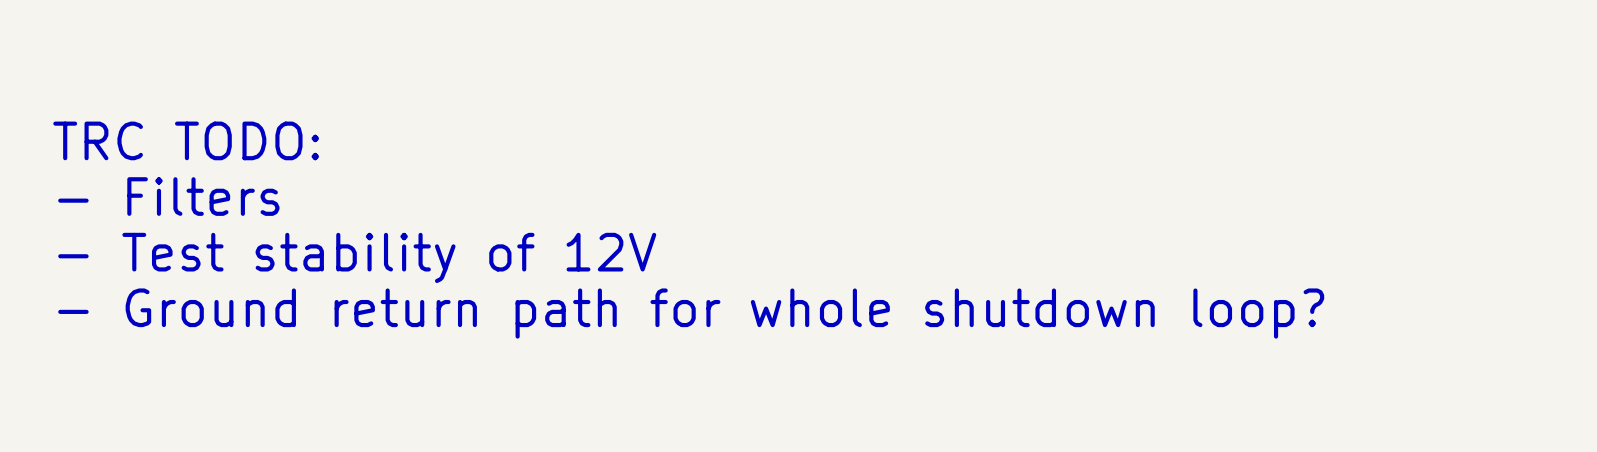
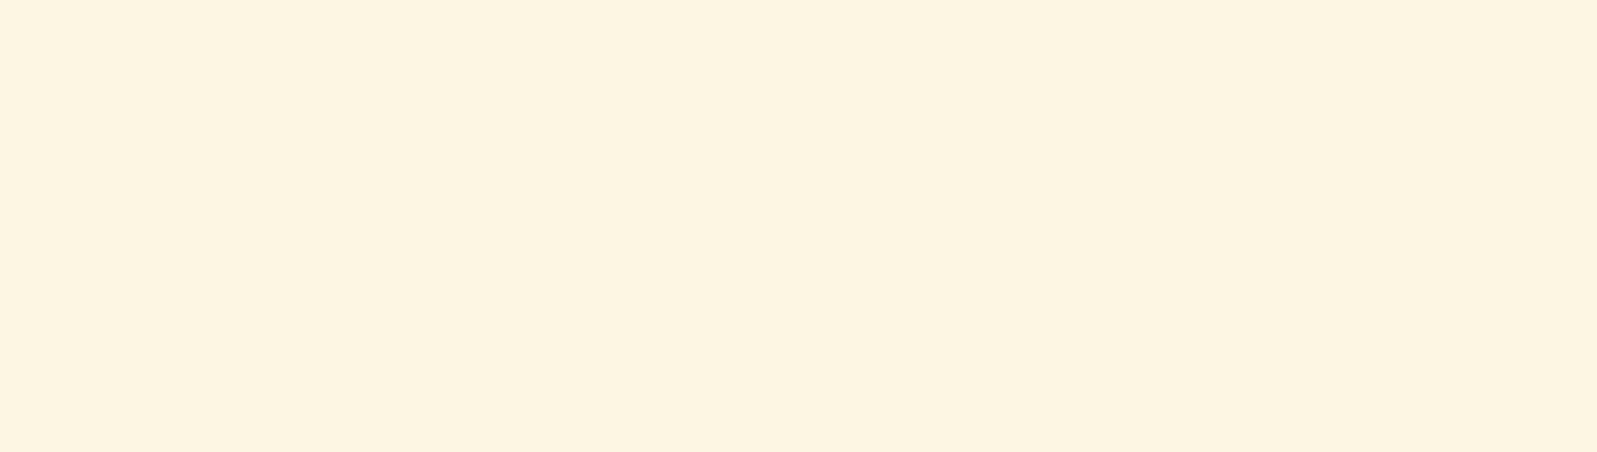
text: TRC TODO: (186, 140) -> none
text: - Filters (168, 196) -> none
text: - Test stability of 12V (357, 257) -> none
text: - Ground return path for whole shutdown loop? (691, 313) -> none

